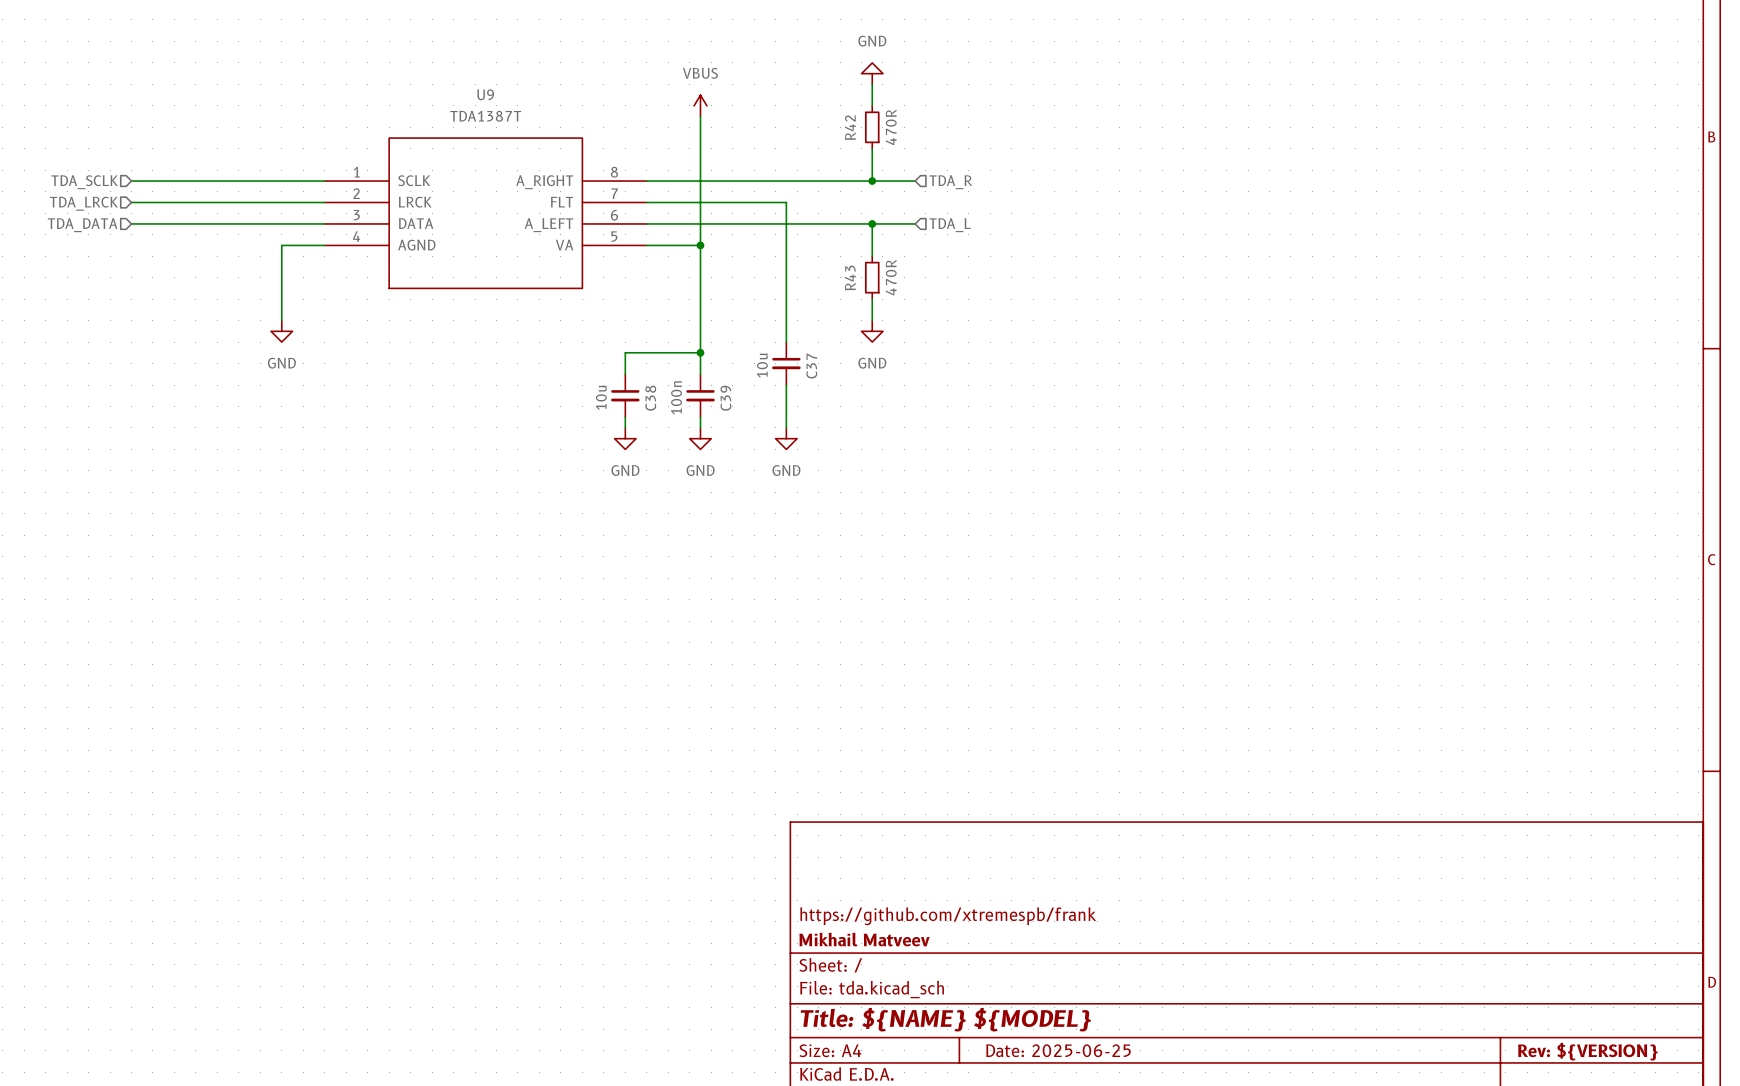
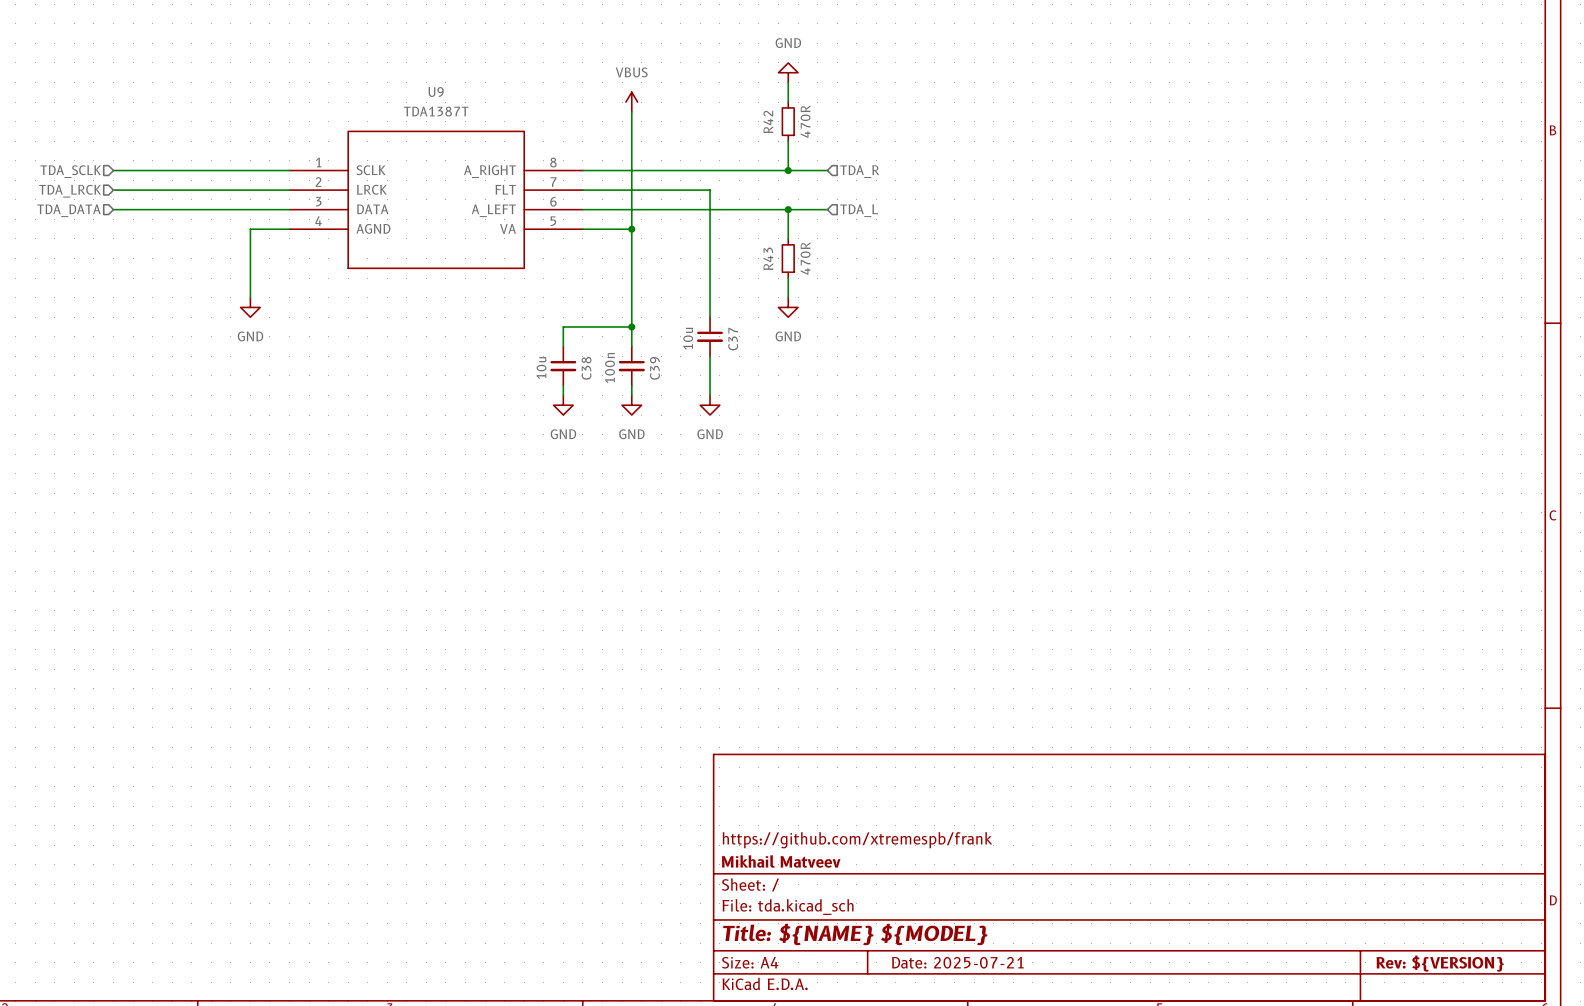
title block: Date: 2025-06-25 (1058, 1050) -> Date: 2025-07-21 (957, 962)

